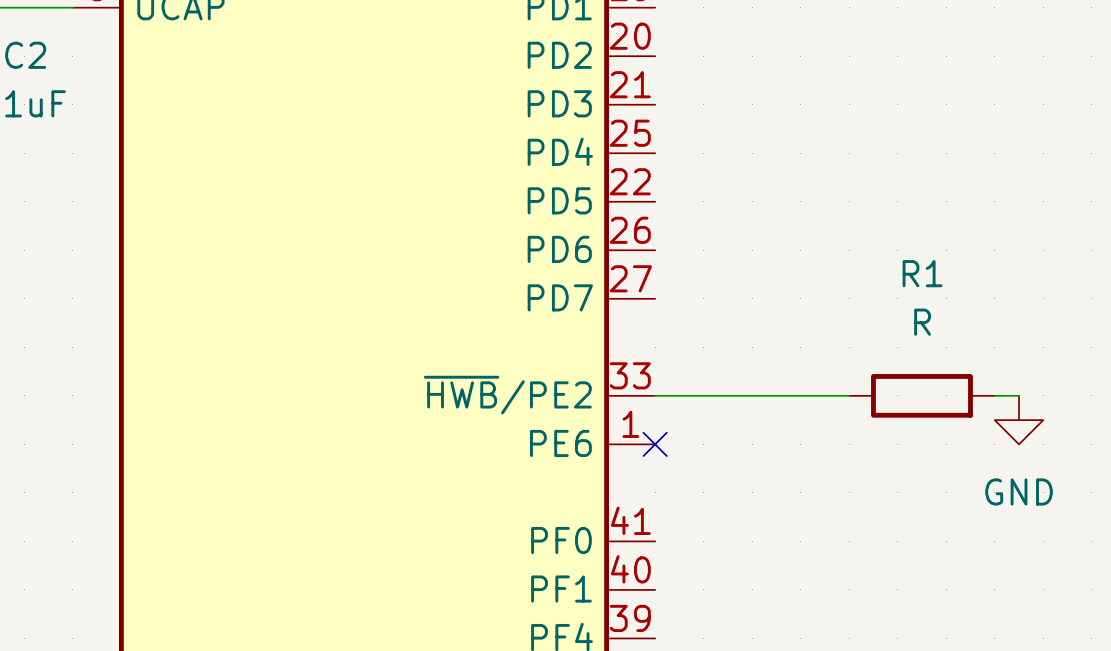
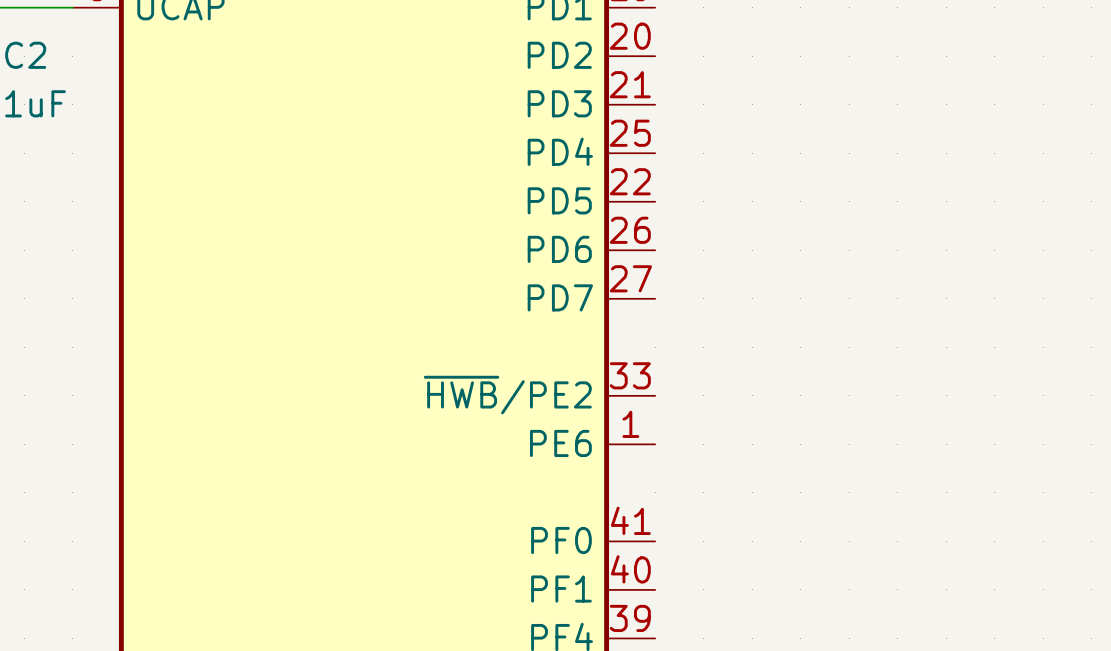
wire: (655, 395) (849, 395) -> none
R1: R (921, 395) -> none
wire: (994, 395) (1019, 395) -> none
power symbol: GND (1019, 420) -> none
no-connect mark: (655, 444) -> none

